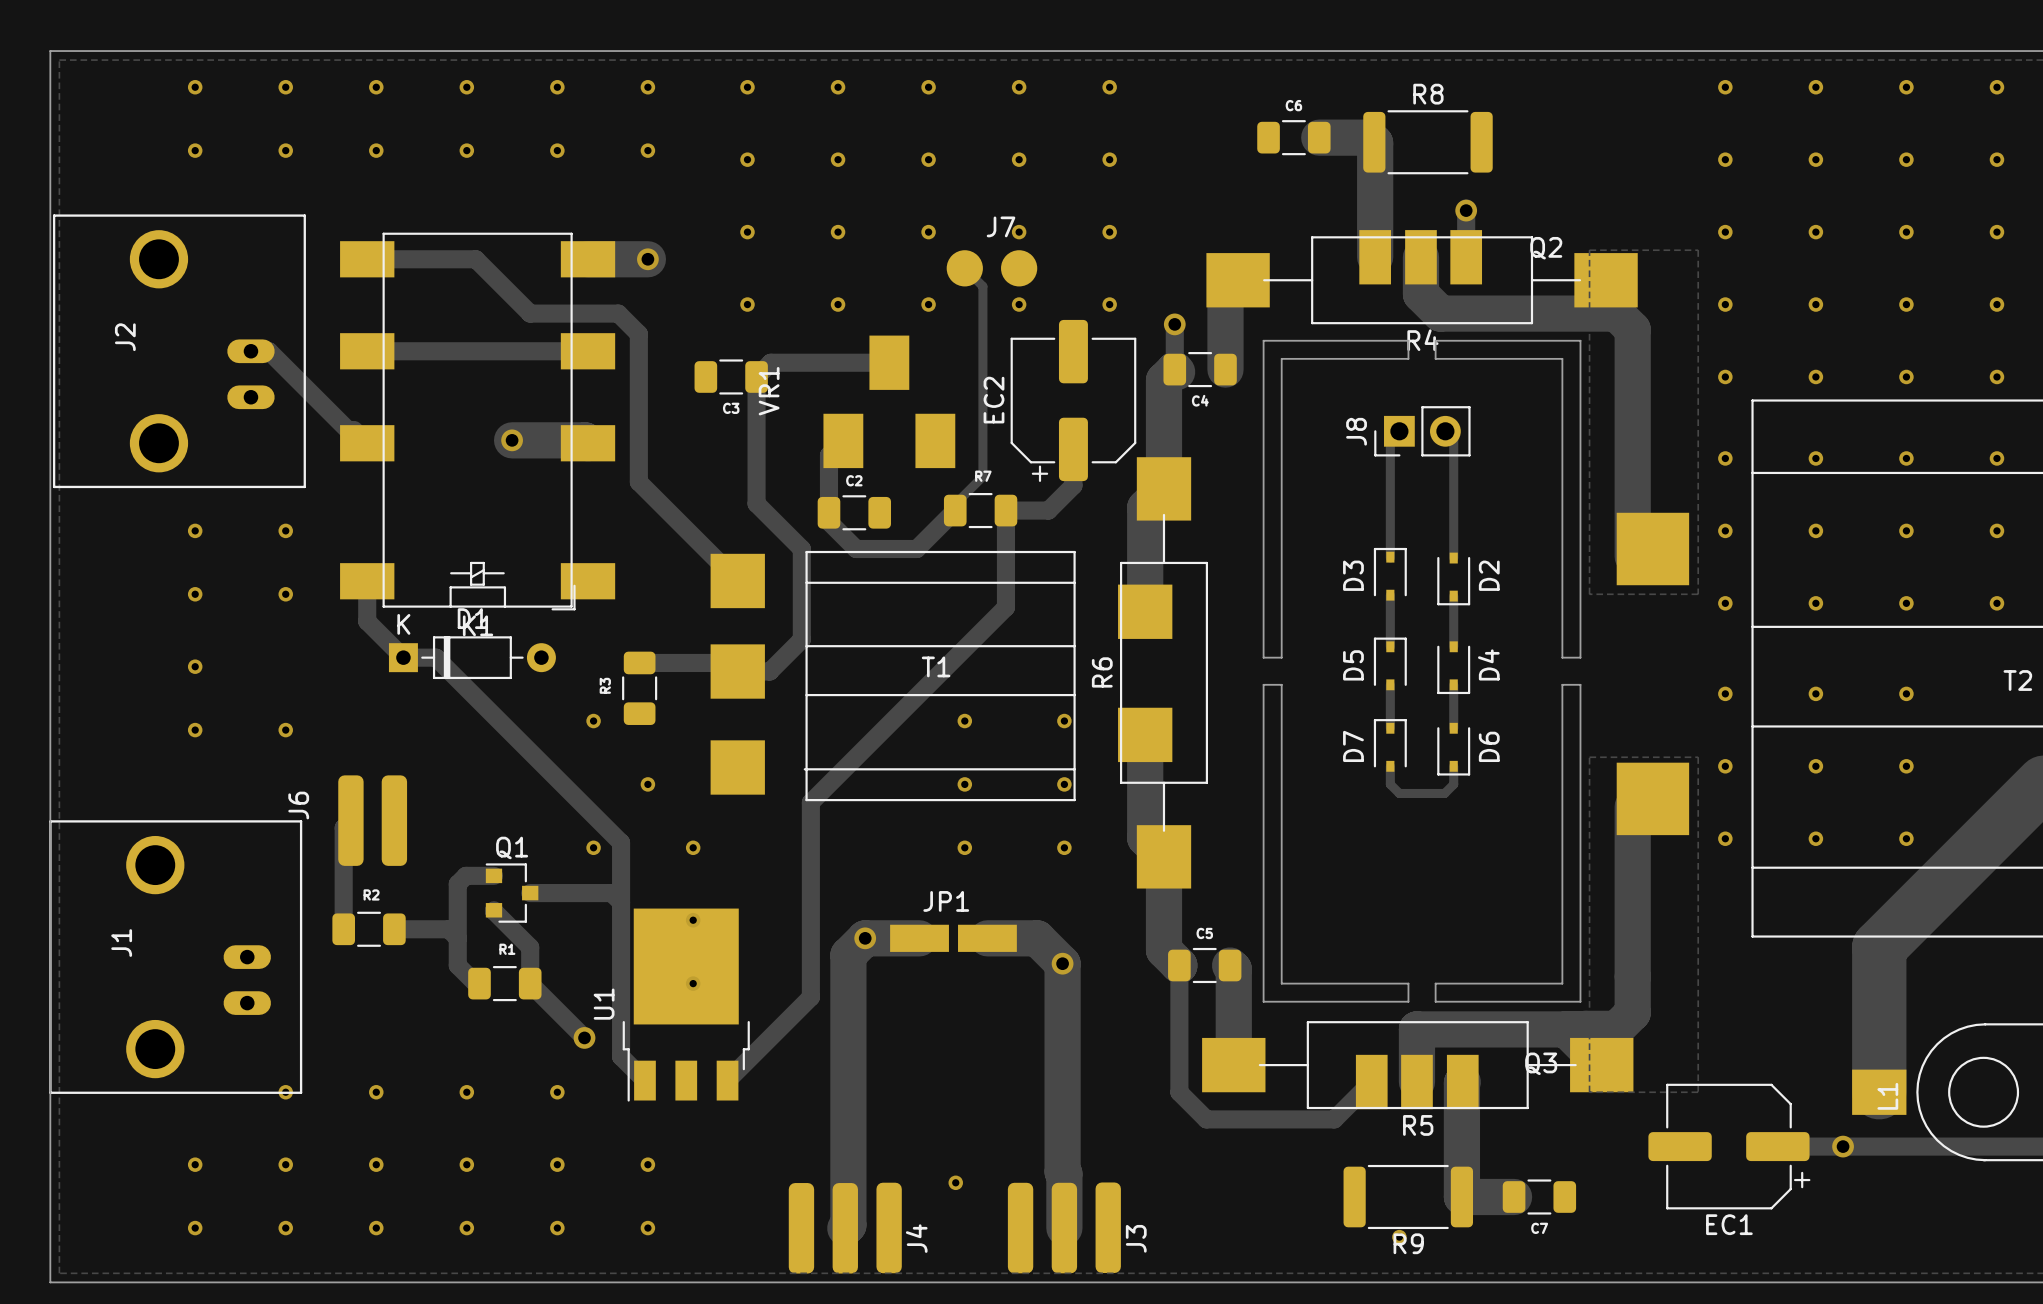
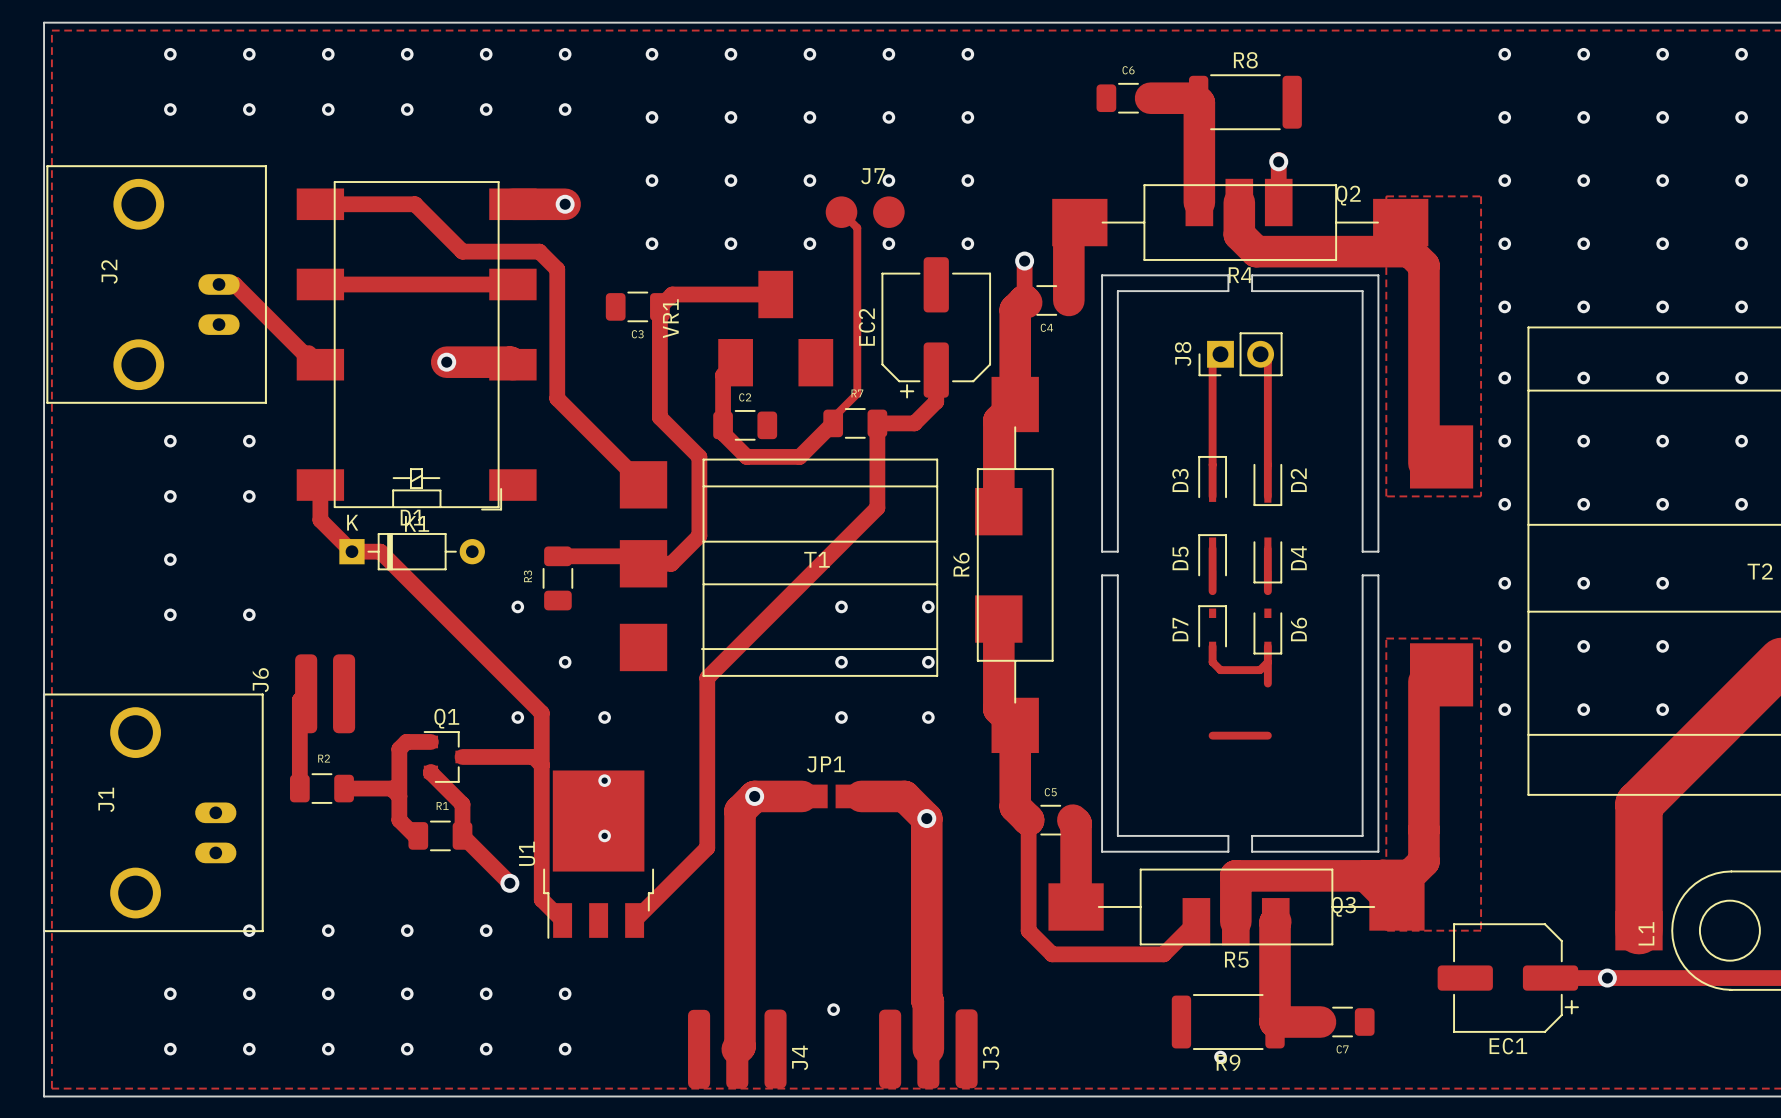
track: none -> (1212, 464) (1212, 496)
track: none -> (1267, 464) (1267, 496)
track: (1390, 595) (1390, 646) -> none
track: (1453, 596) (1453, 646) -> none
track: none -> (1212, 548) (1212, 575)
track: none -> (1267, 548) (1267, 575)
track: (1390, 702) (1390, 728) -> none
track: (1453, 702) (1453, 728) -> none
track: none -> (1267, 662) (1267, 683)
track: none -> (1212, 735) (1267, 735)

